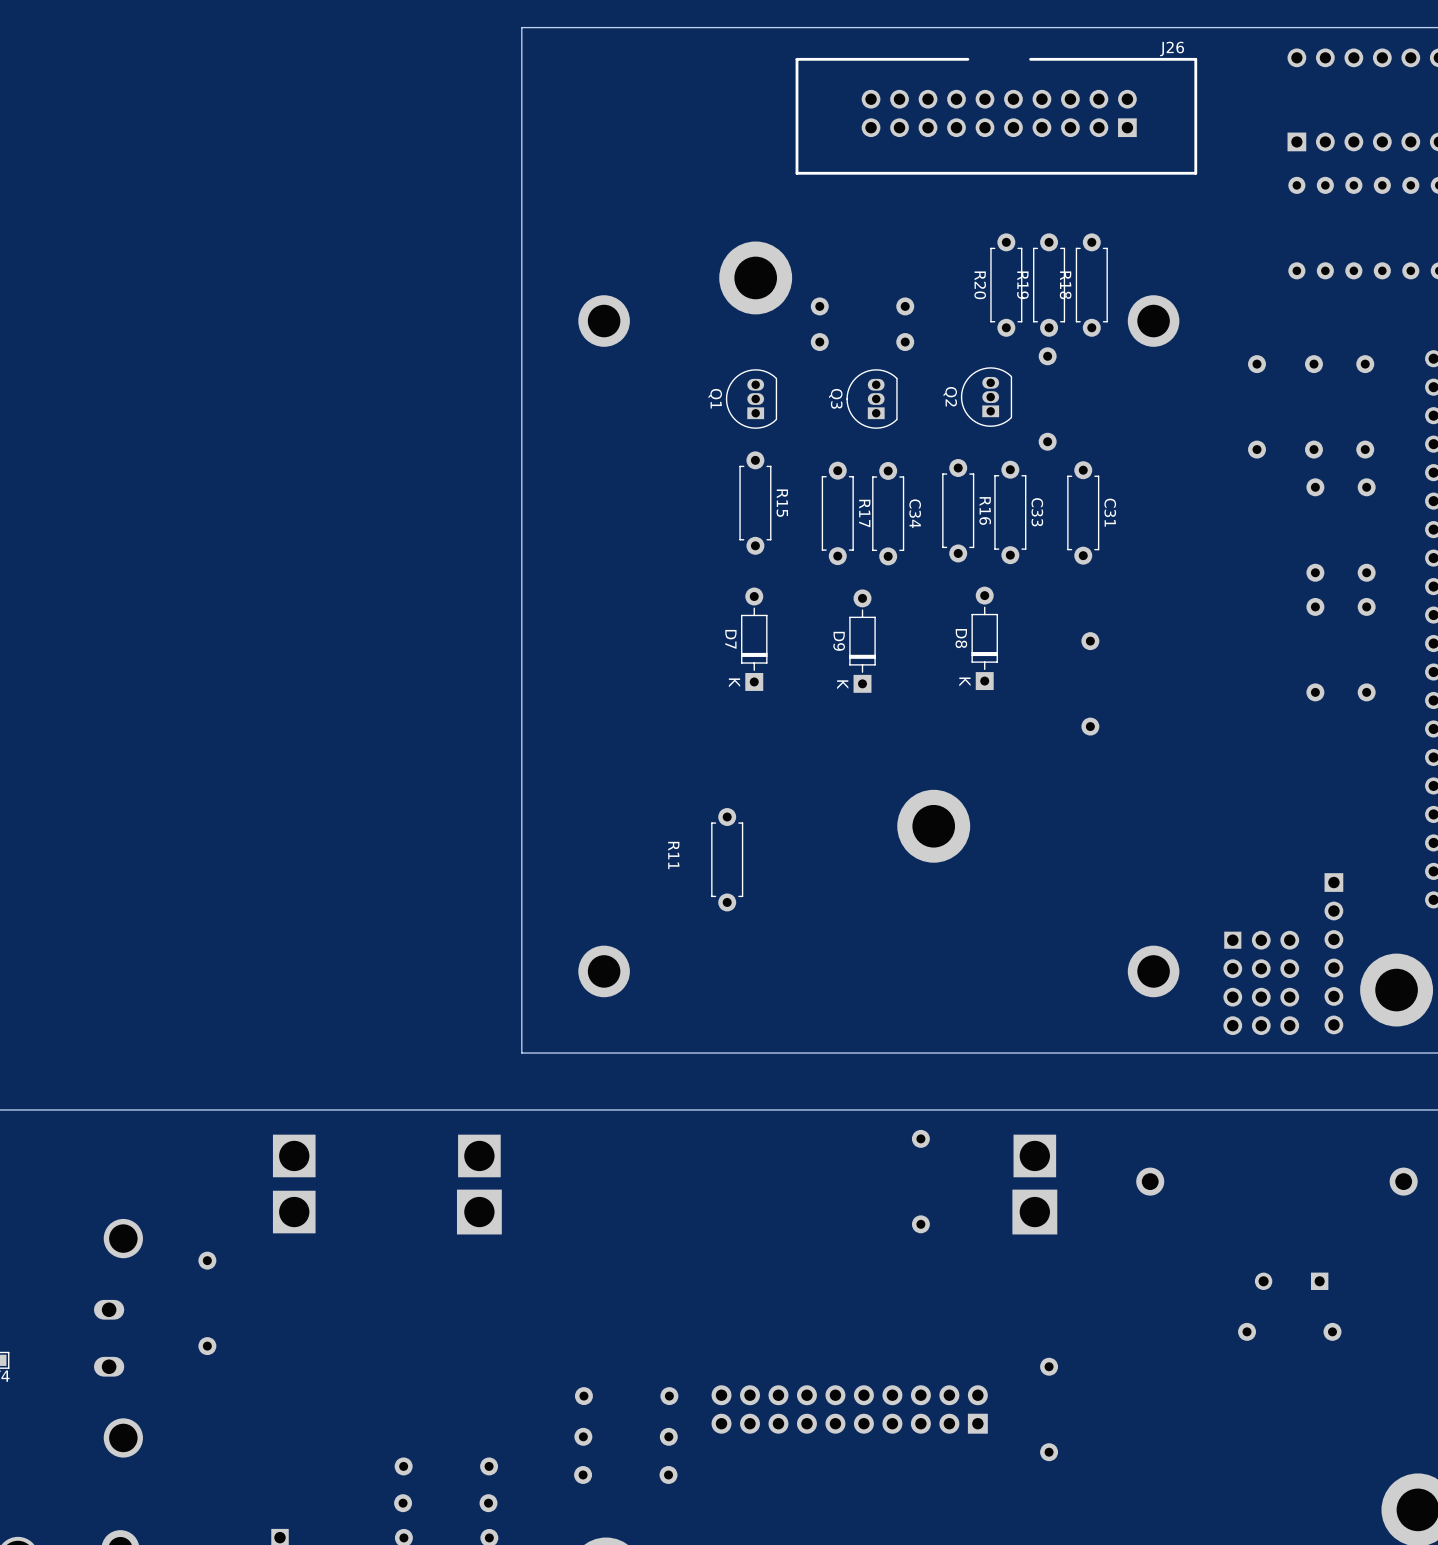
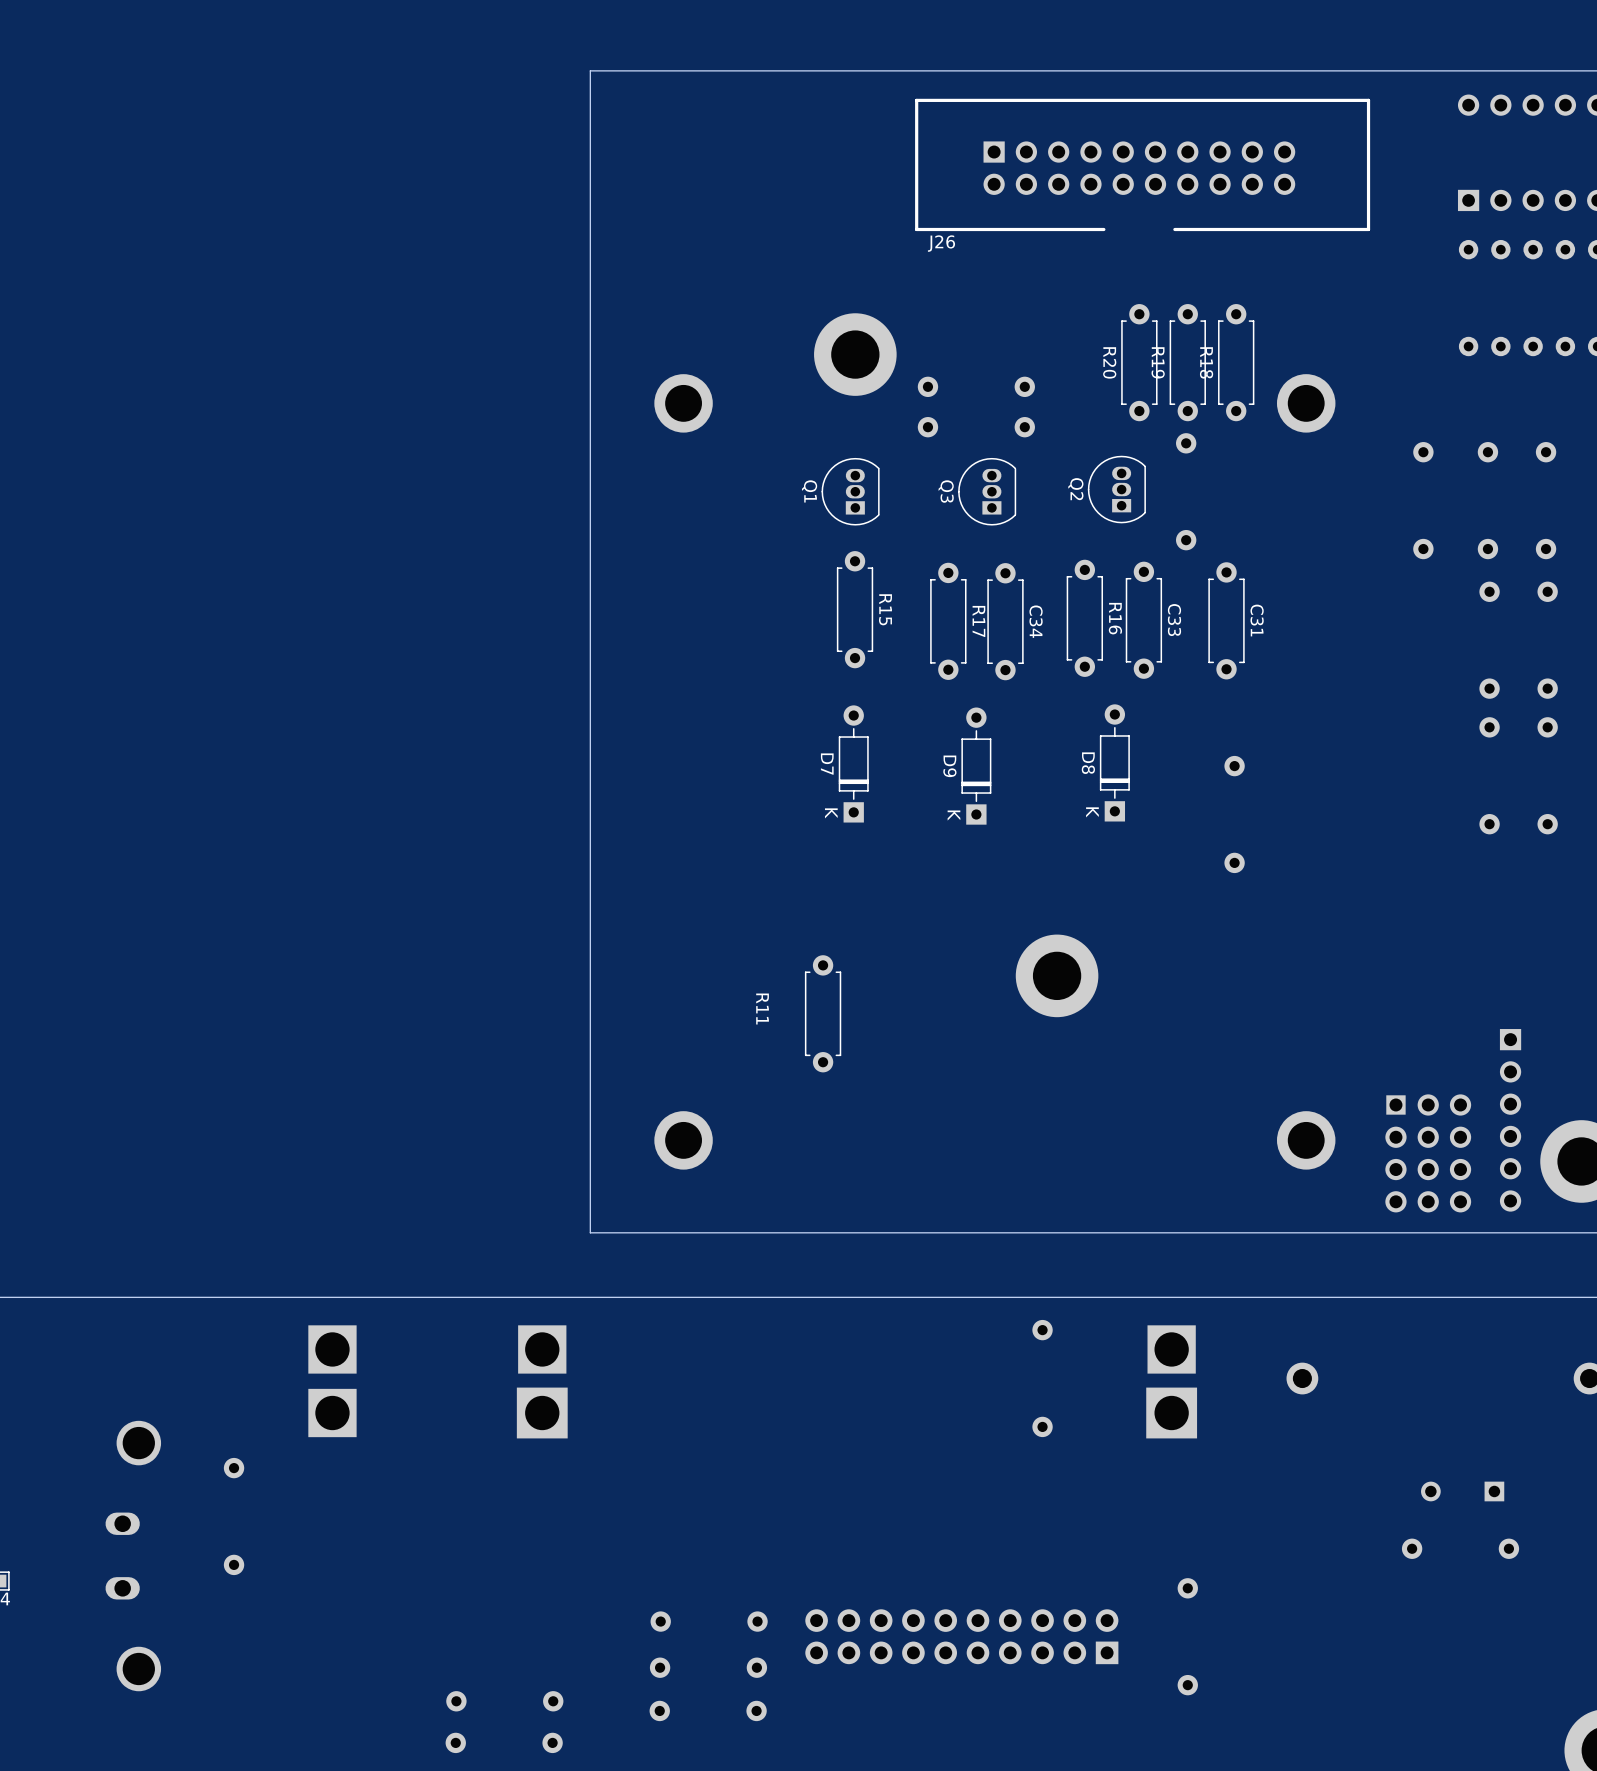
J26 rotation: 0° (996, 116) -> 180° (1142, 164)

